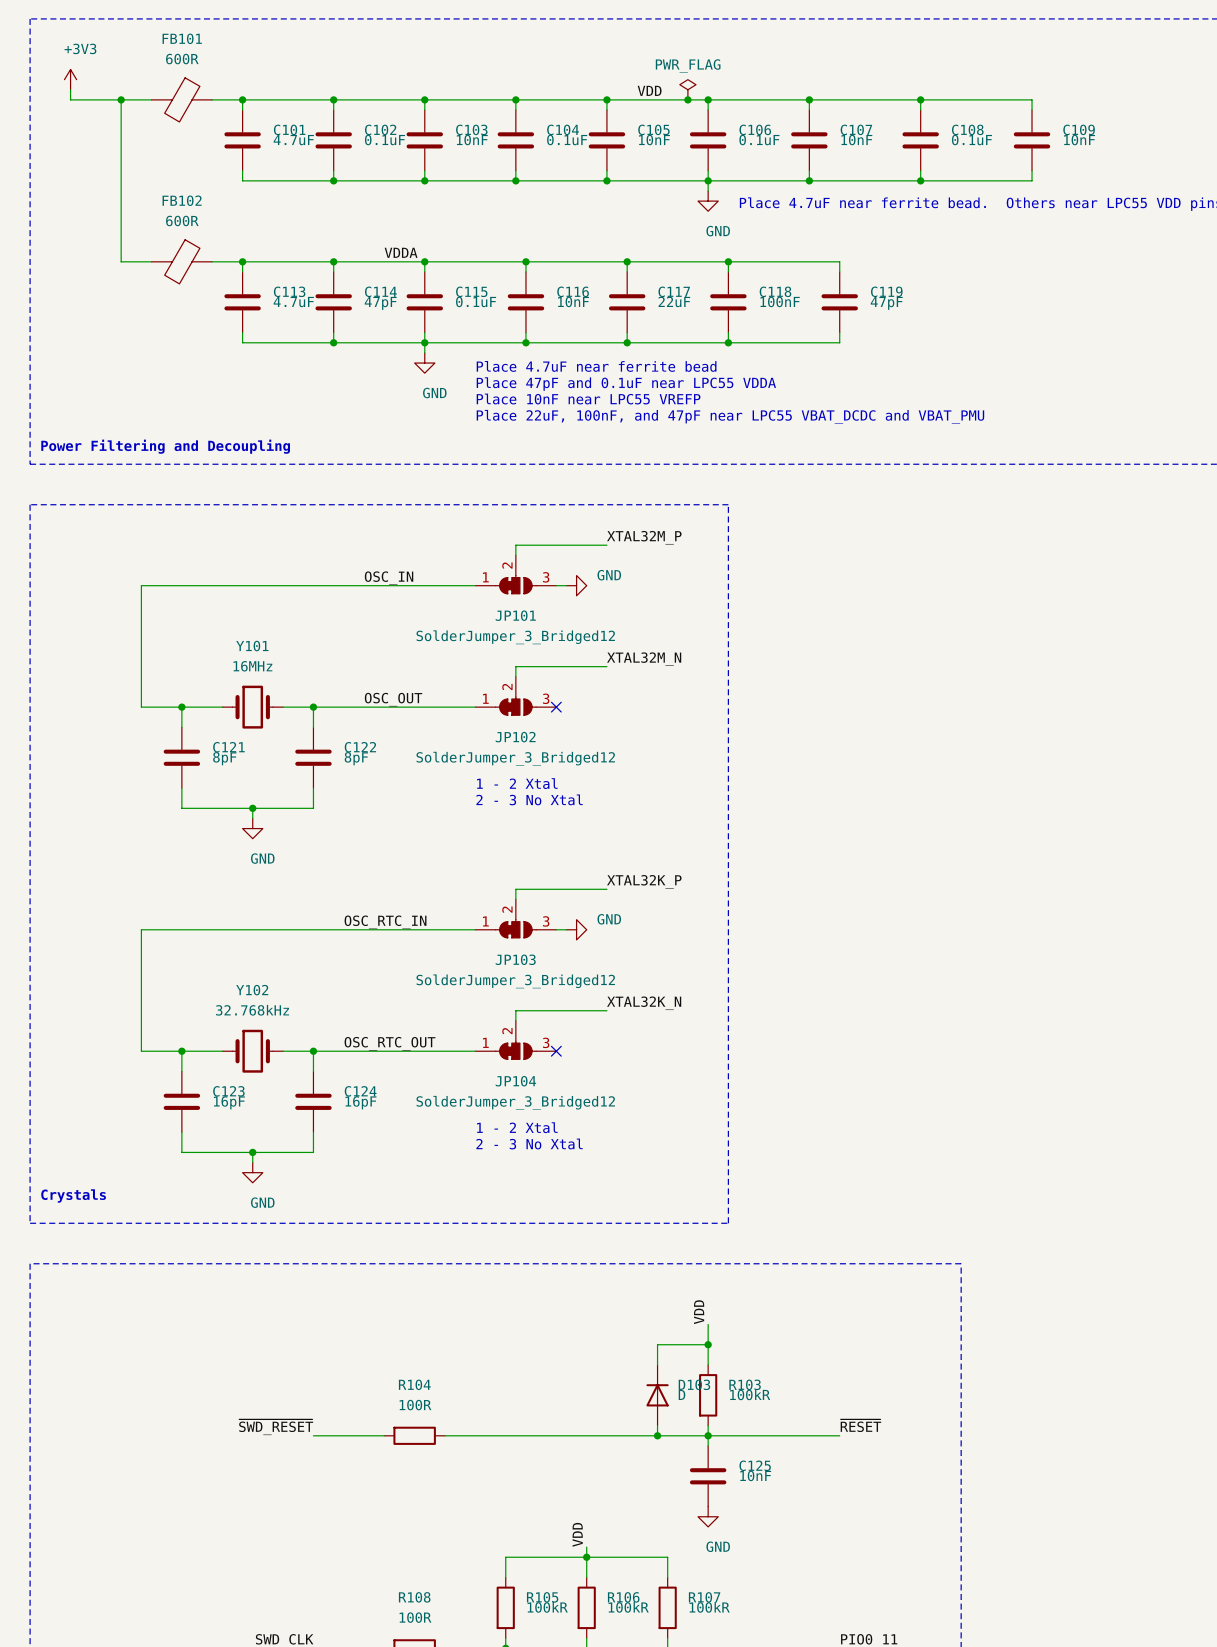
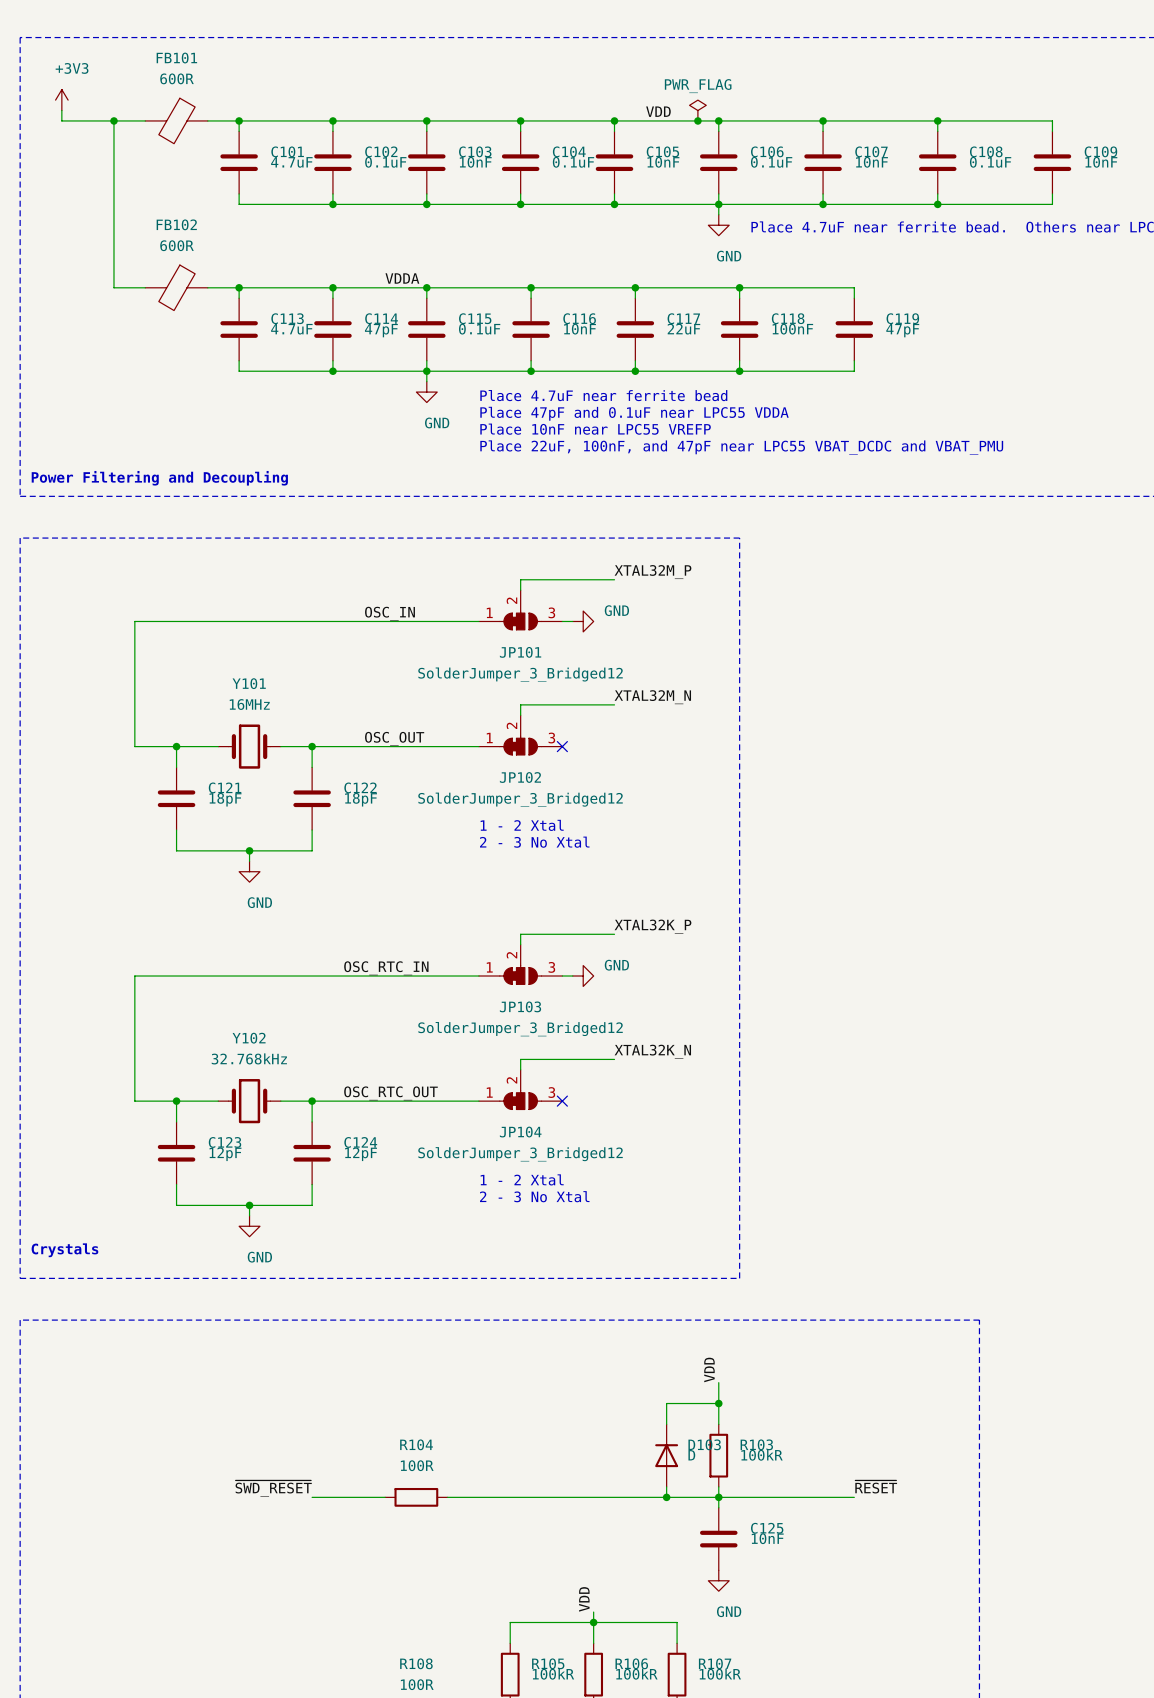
C121 value: 8pF (224, 758) -> 18pF (225, 799)
C122 value: 8pF (356, 758) -> 18pF (361, 799)
C123 value: 16pF (229, 1102) -> 12pF (225, 1154)
C124 value: 16pF (360, 1102) -> 12pF (361, 1154)

